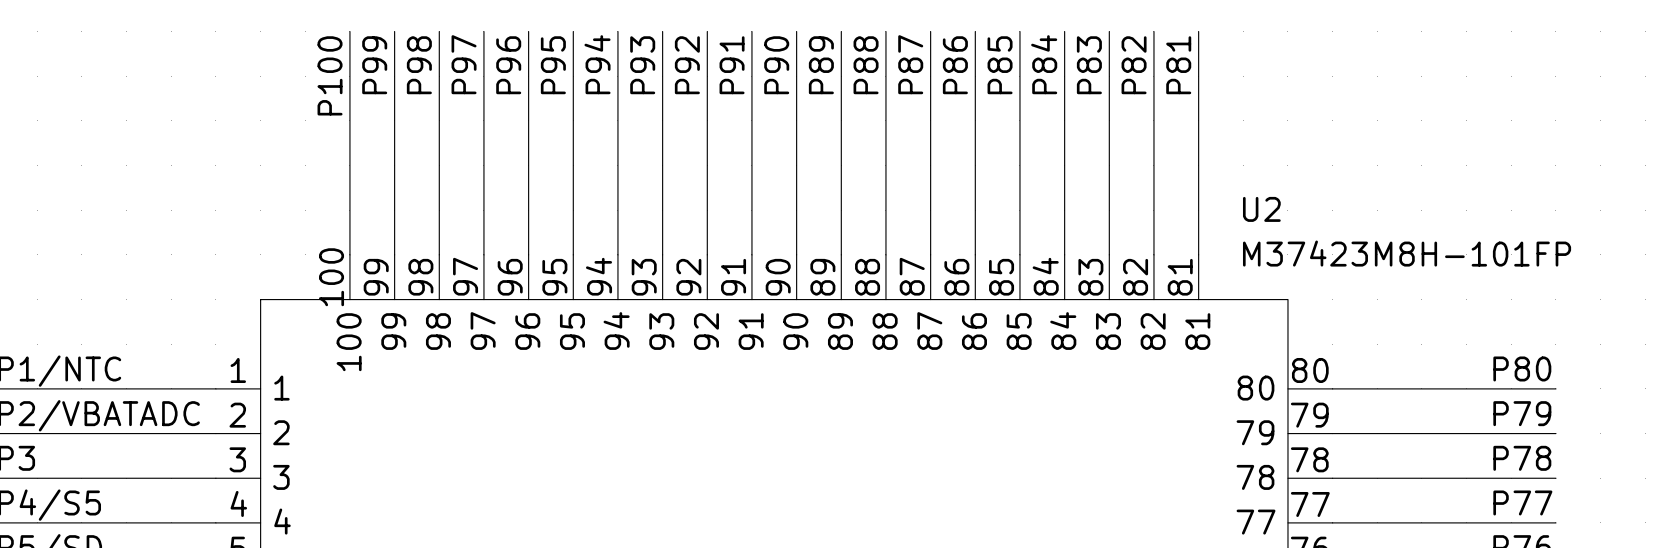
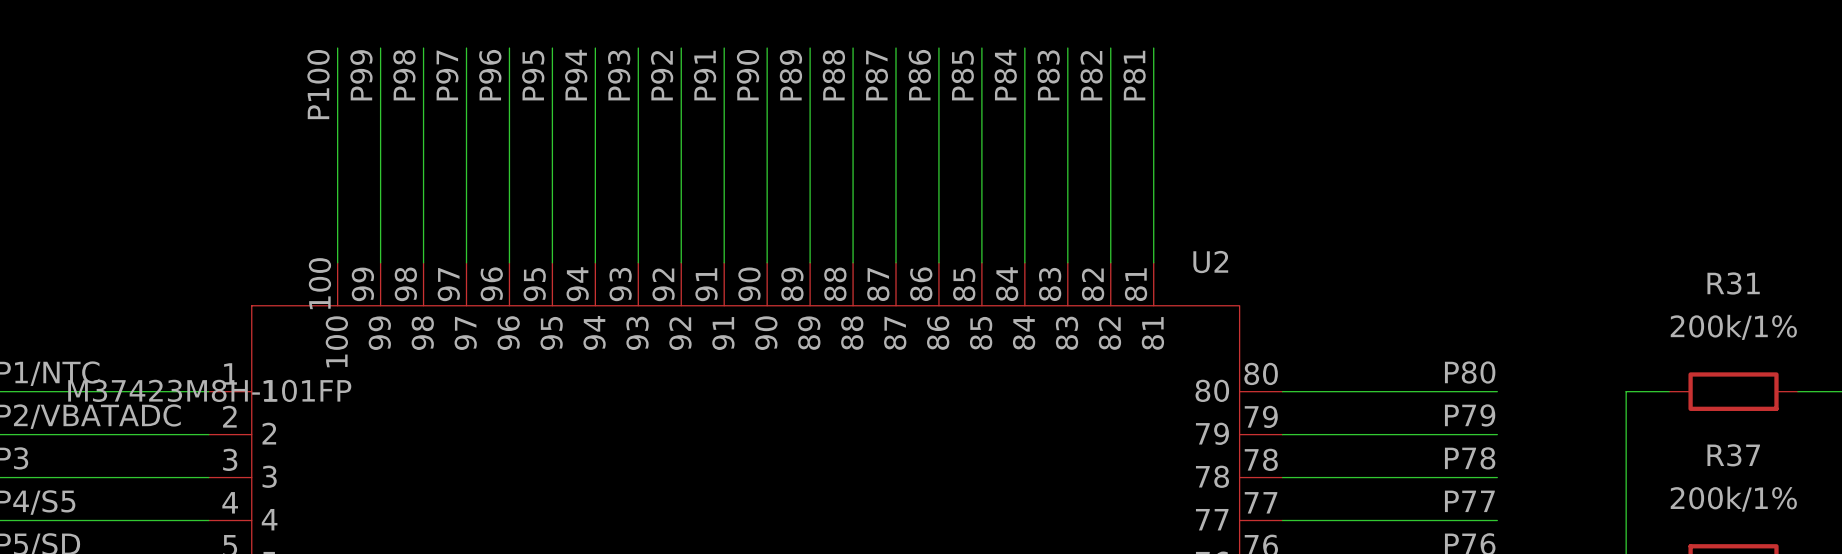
U2 name position: U2 (1261, 209) -> U2 (1210, 262)
U2 value position: M37423M8H-101FP (1407, 253) -> M37423M8H-101FP (209, 390)

